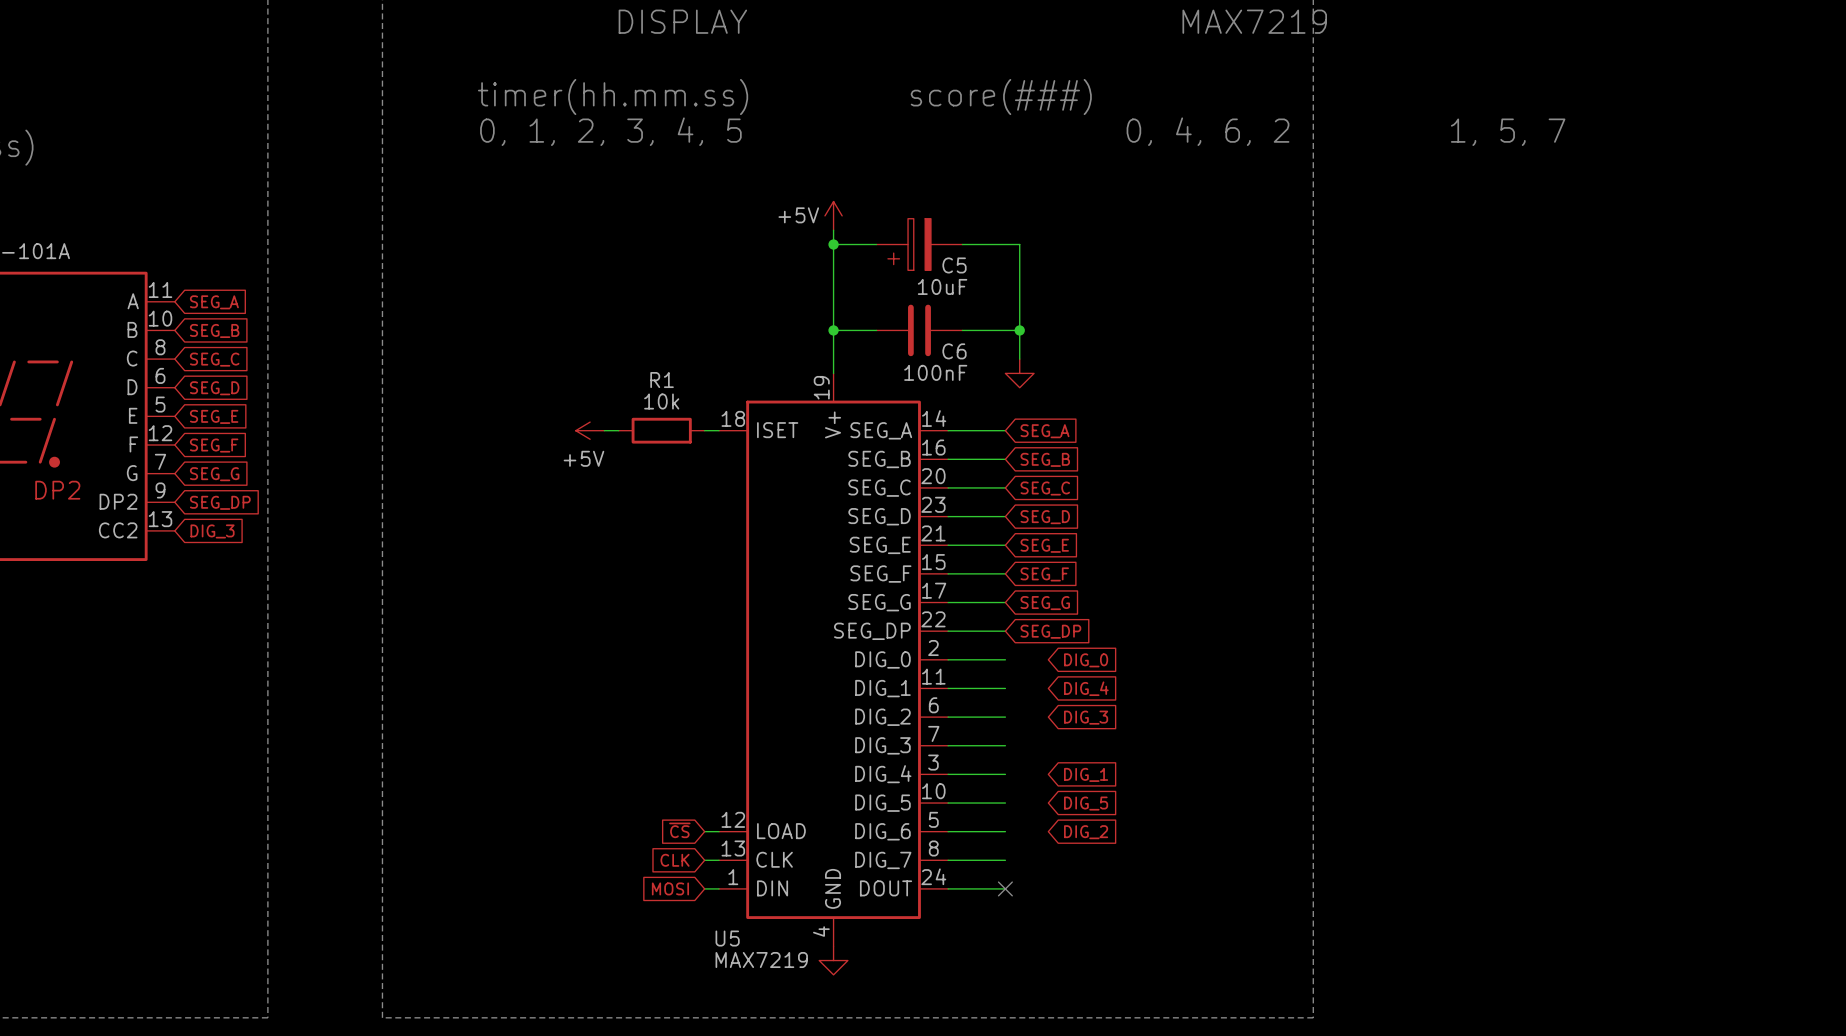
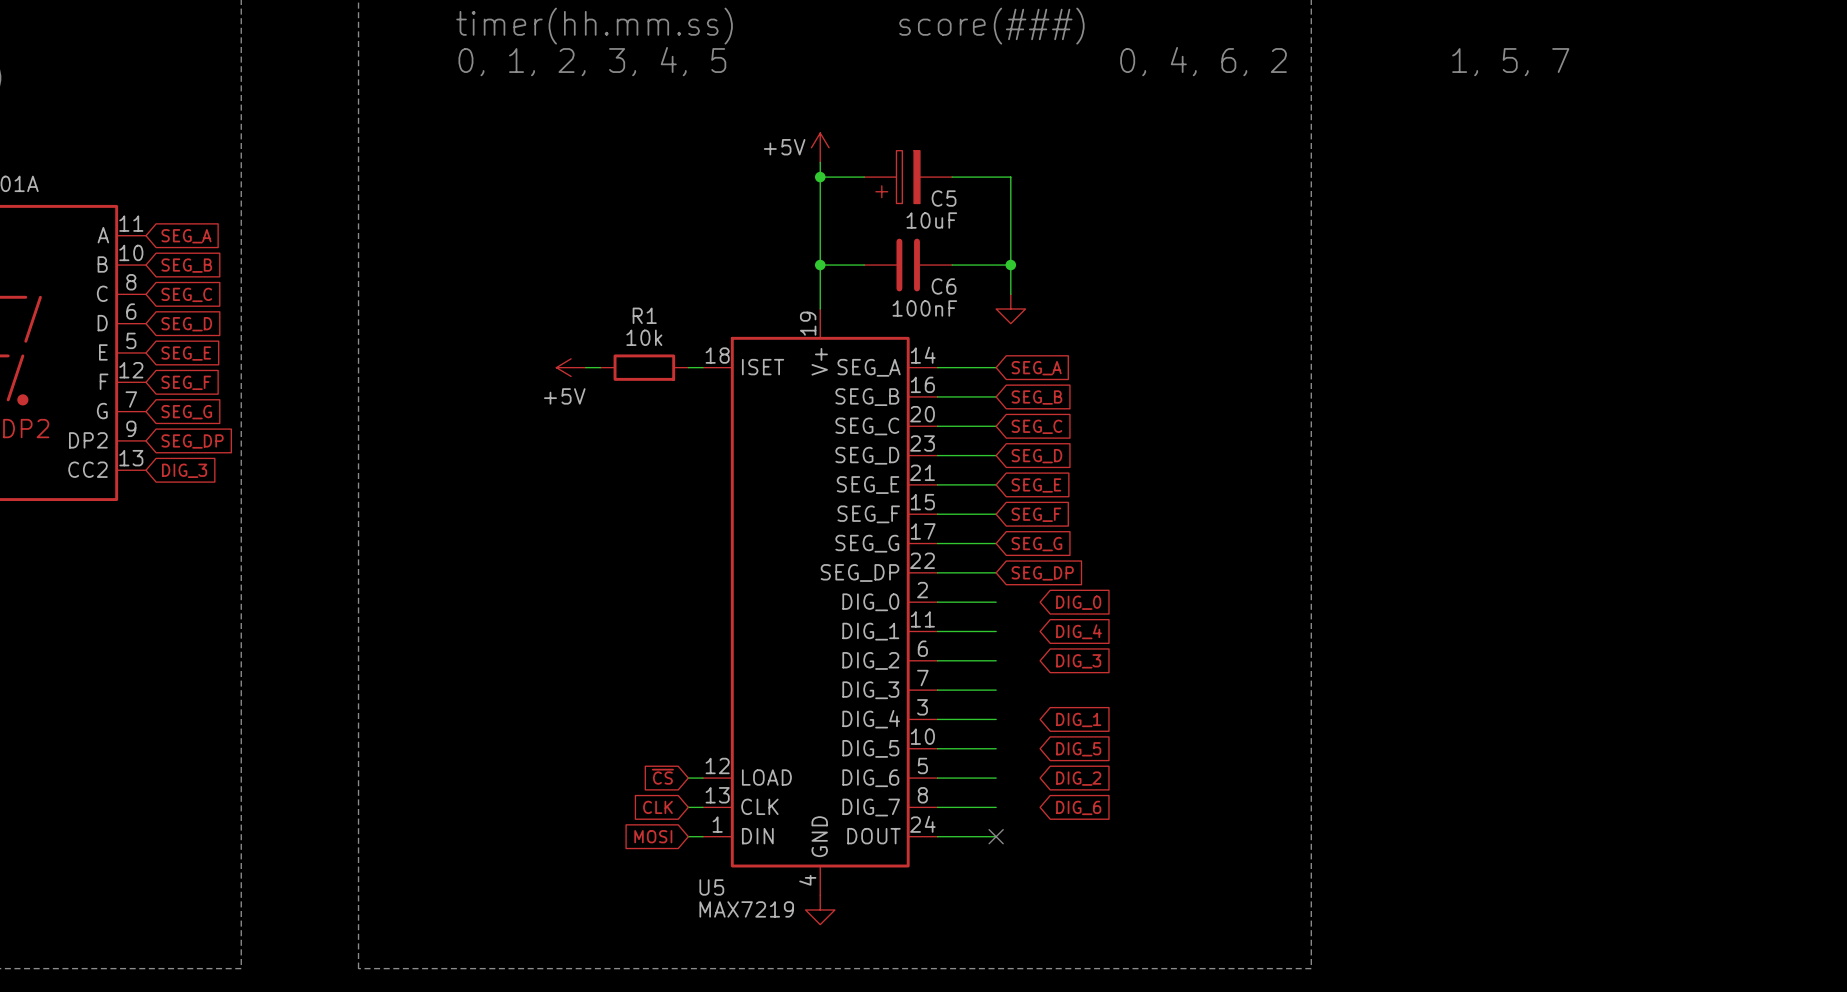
global label: none -> DIG_6 (1078, 807)

